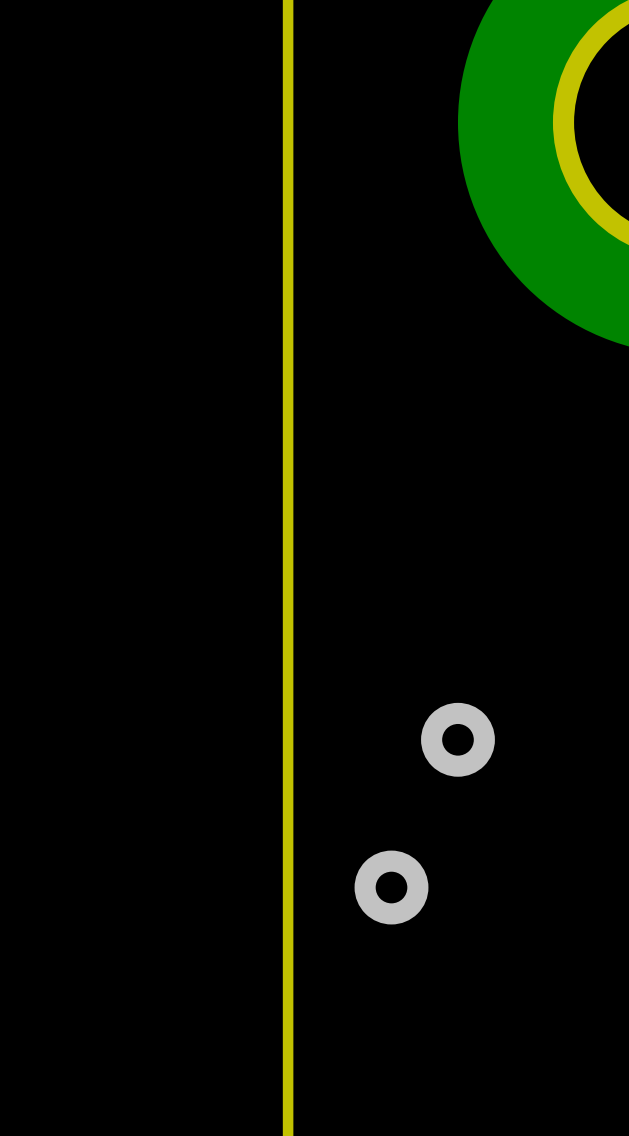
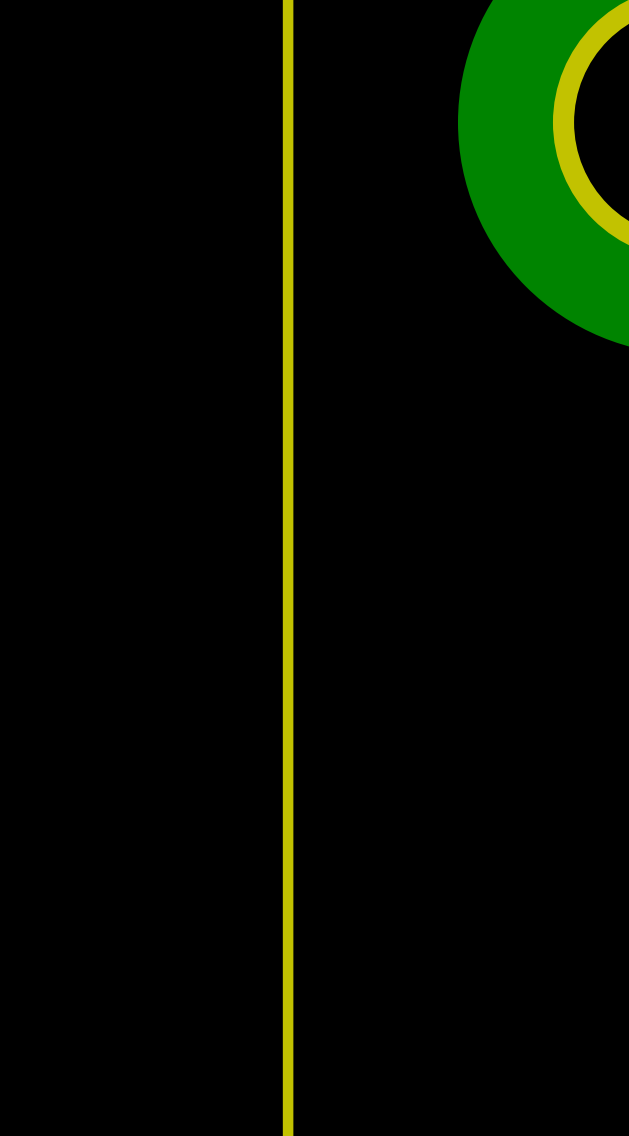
via: (457, 739) -> none
via: (391, 887) -> none

